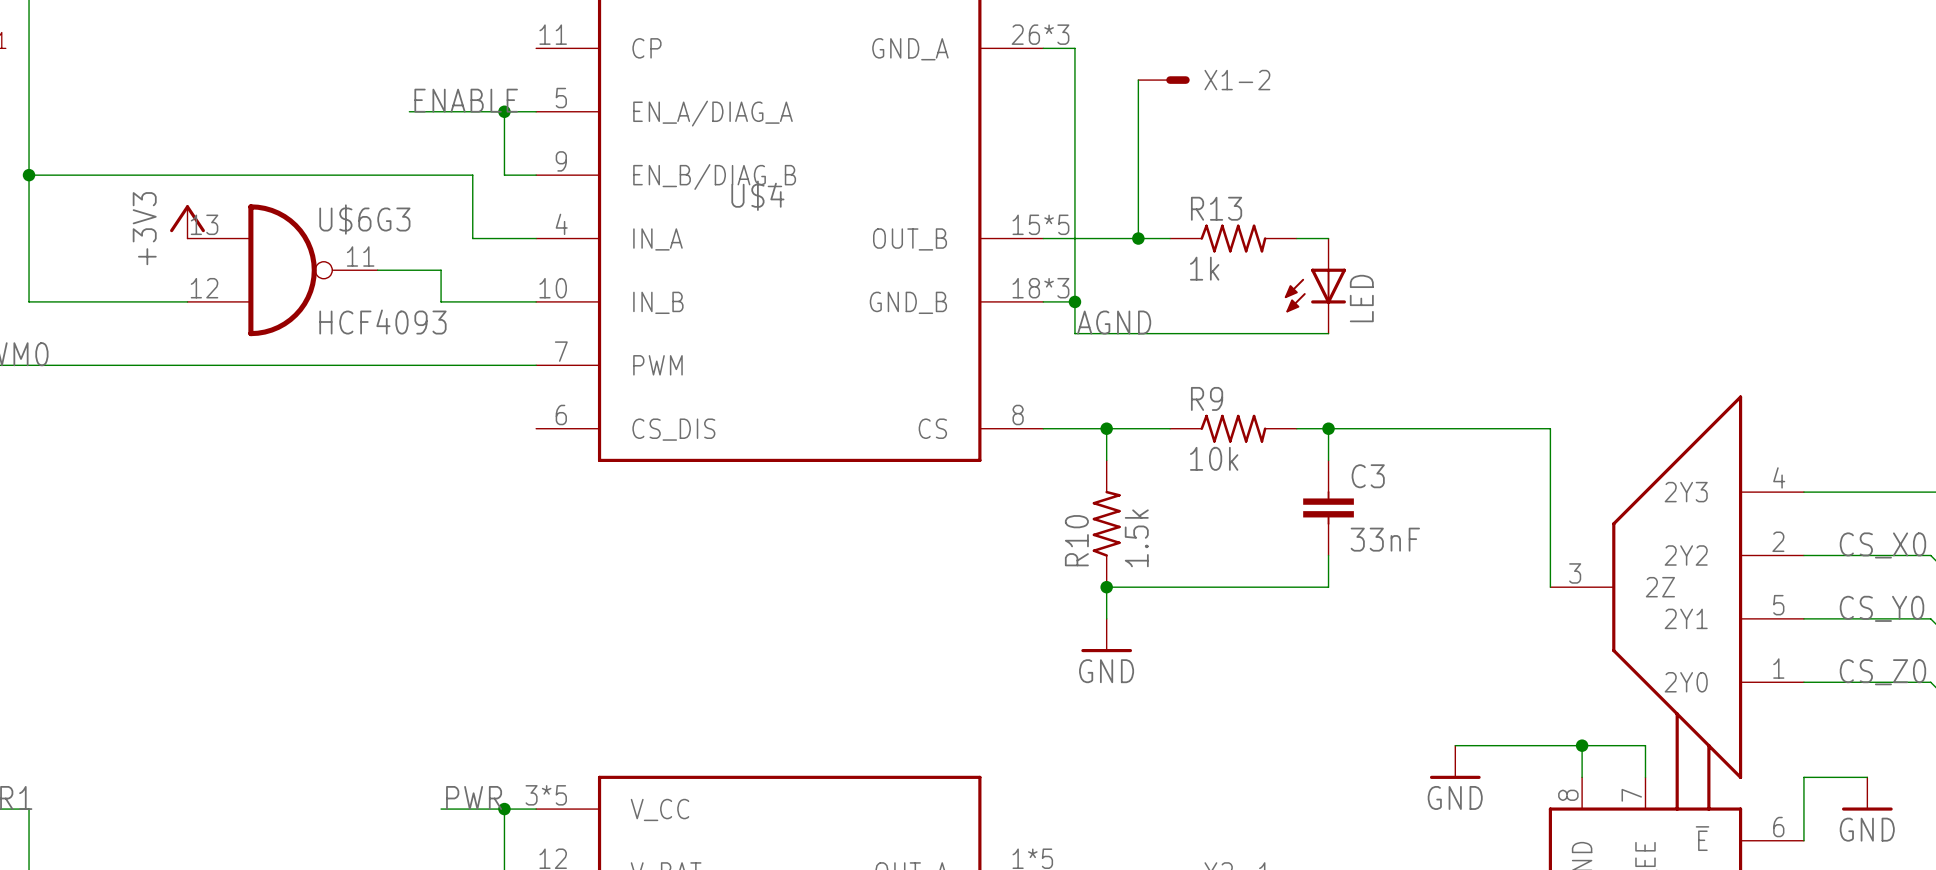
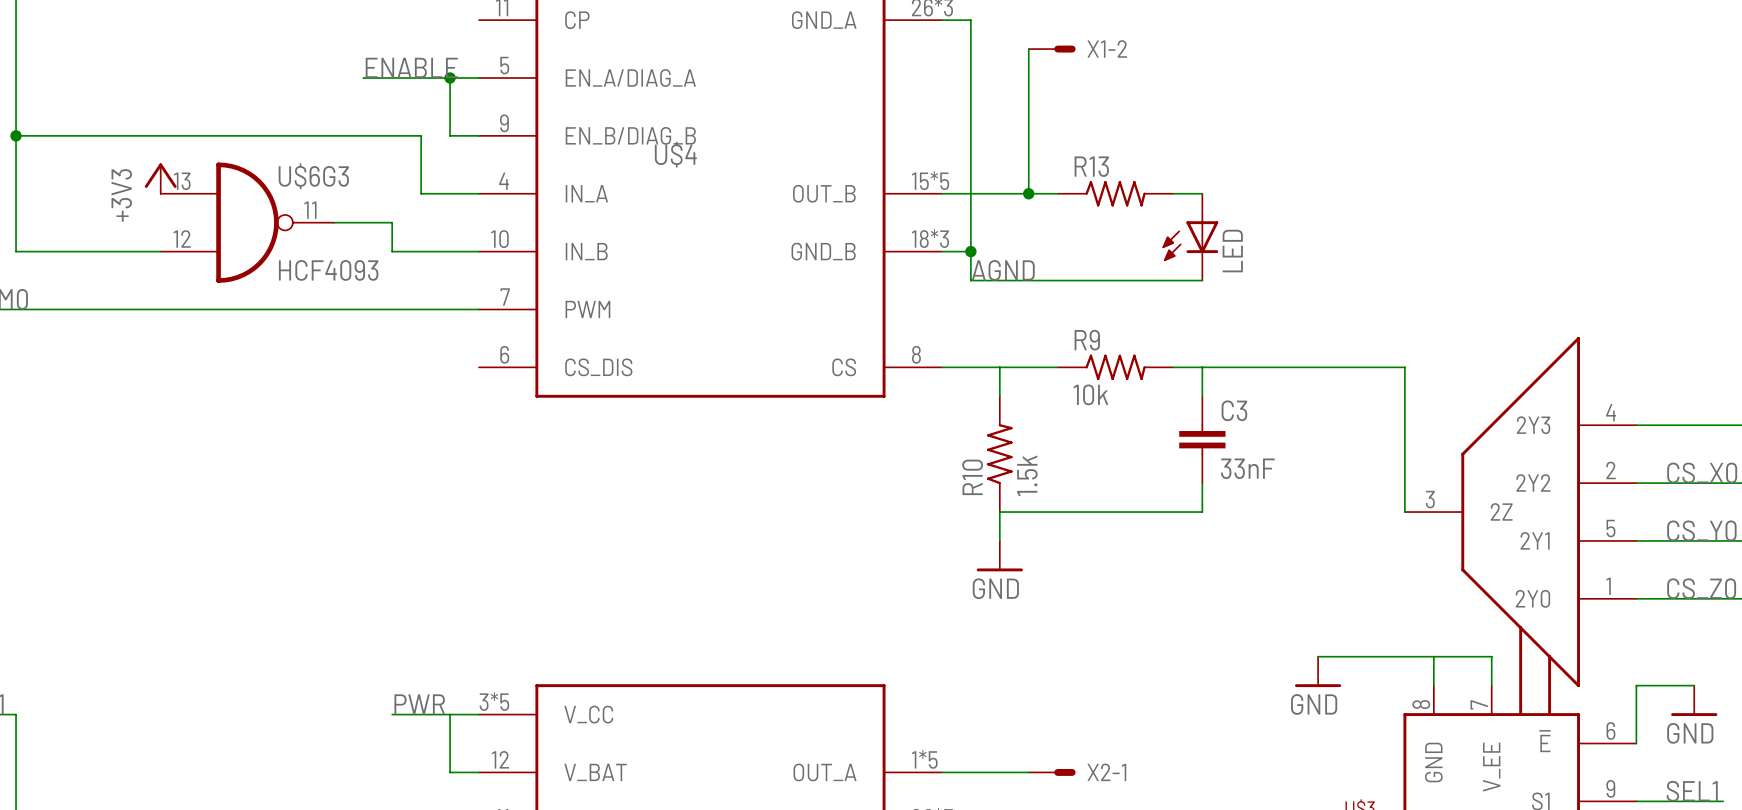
R13 value: 1k (1204, 268) -> none
junction: (1106, 428) -> none
junction: (1328, 428) -> none
junction: (1106, 587) -> none
junction: (1582, 745) -> none
junction: (504, 809) -> none

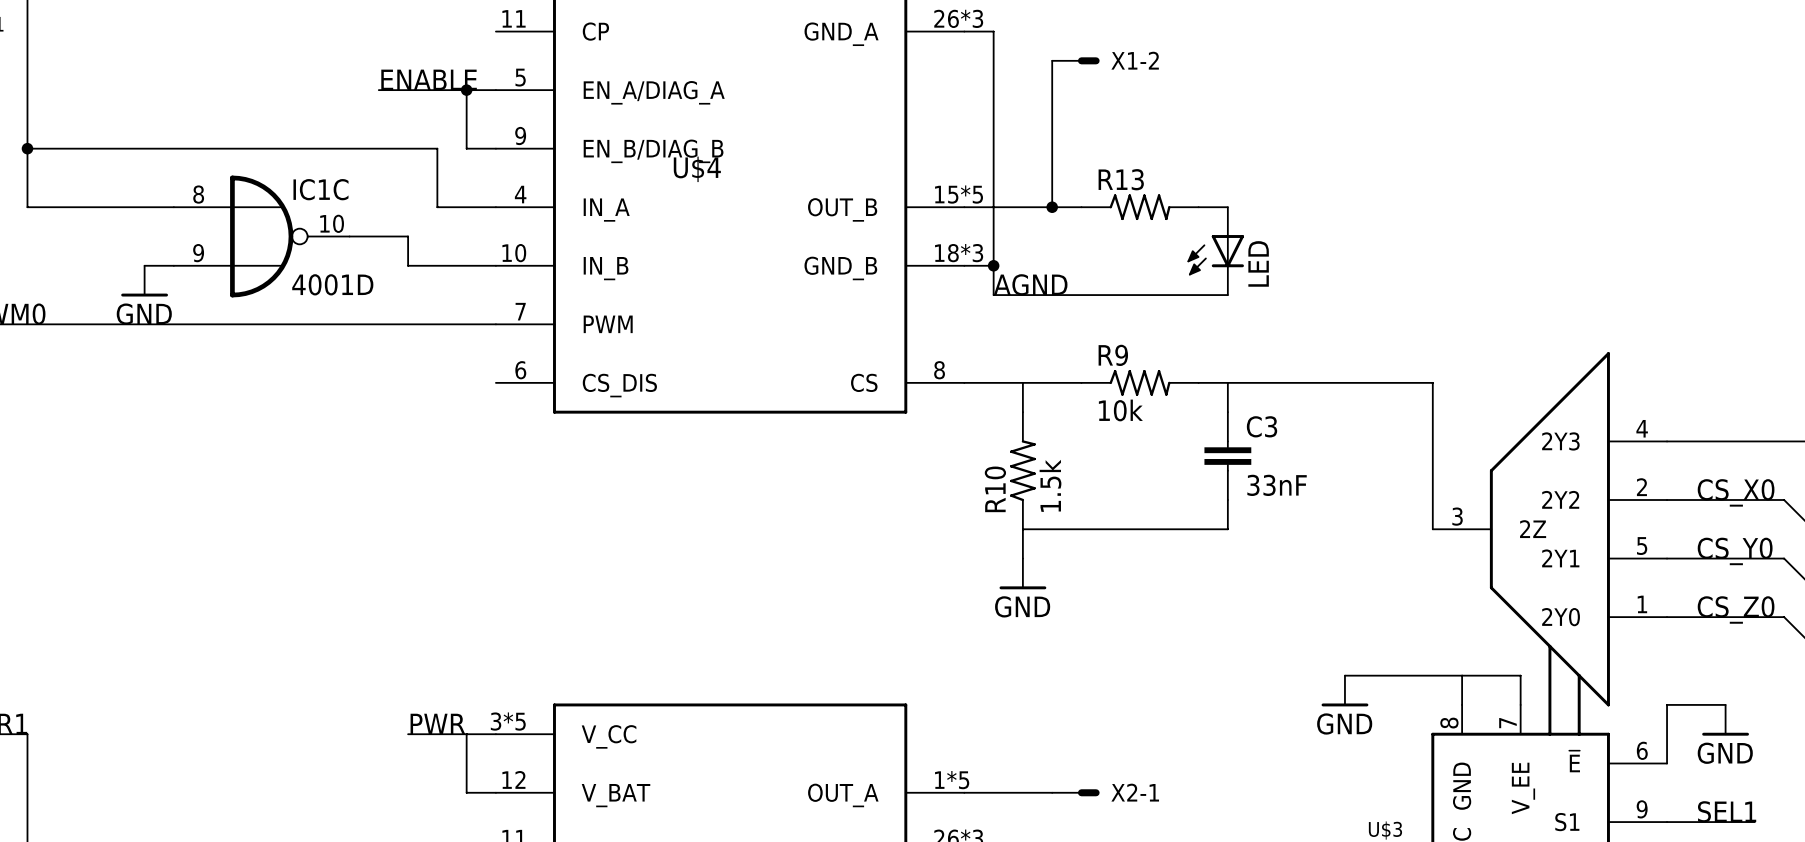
power symbol: +3V3 (160, 178) -> none
wire: (16, 193) (16, 251) (131, 251) -> (27, 207) (173, 207)
U$6G3: HCF4093 (247, 222) -> none
IC1C: none -> 4001D (261, 236)
power symbol: none -> GND (144, 281)

